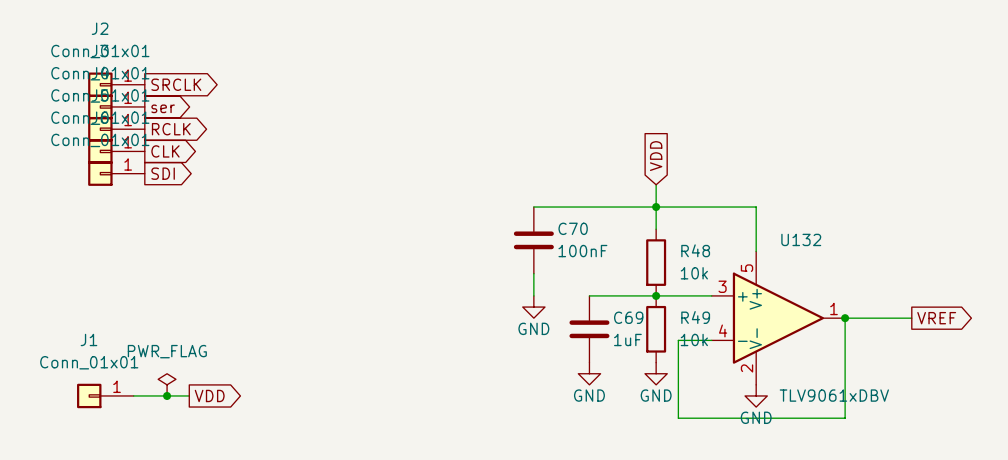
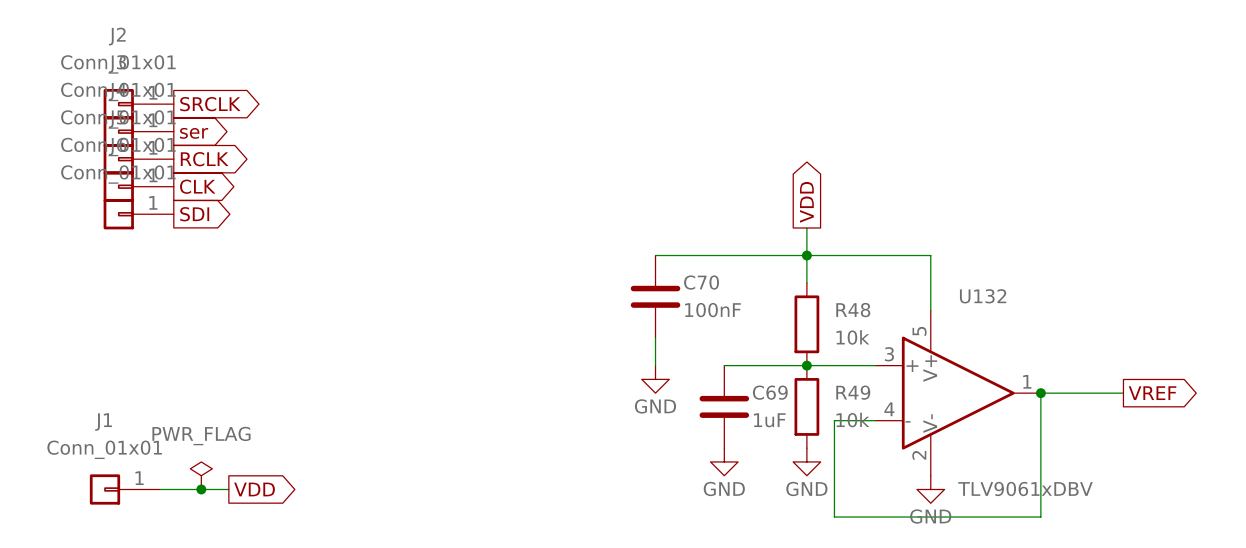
global label shape: input (656, 156) -> output (806, 202)

